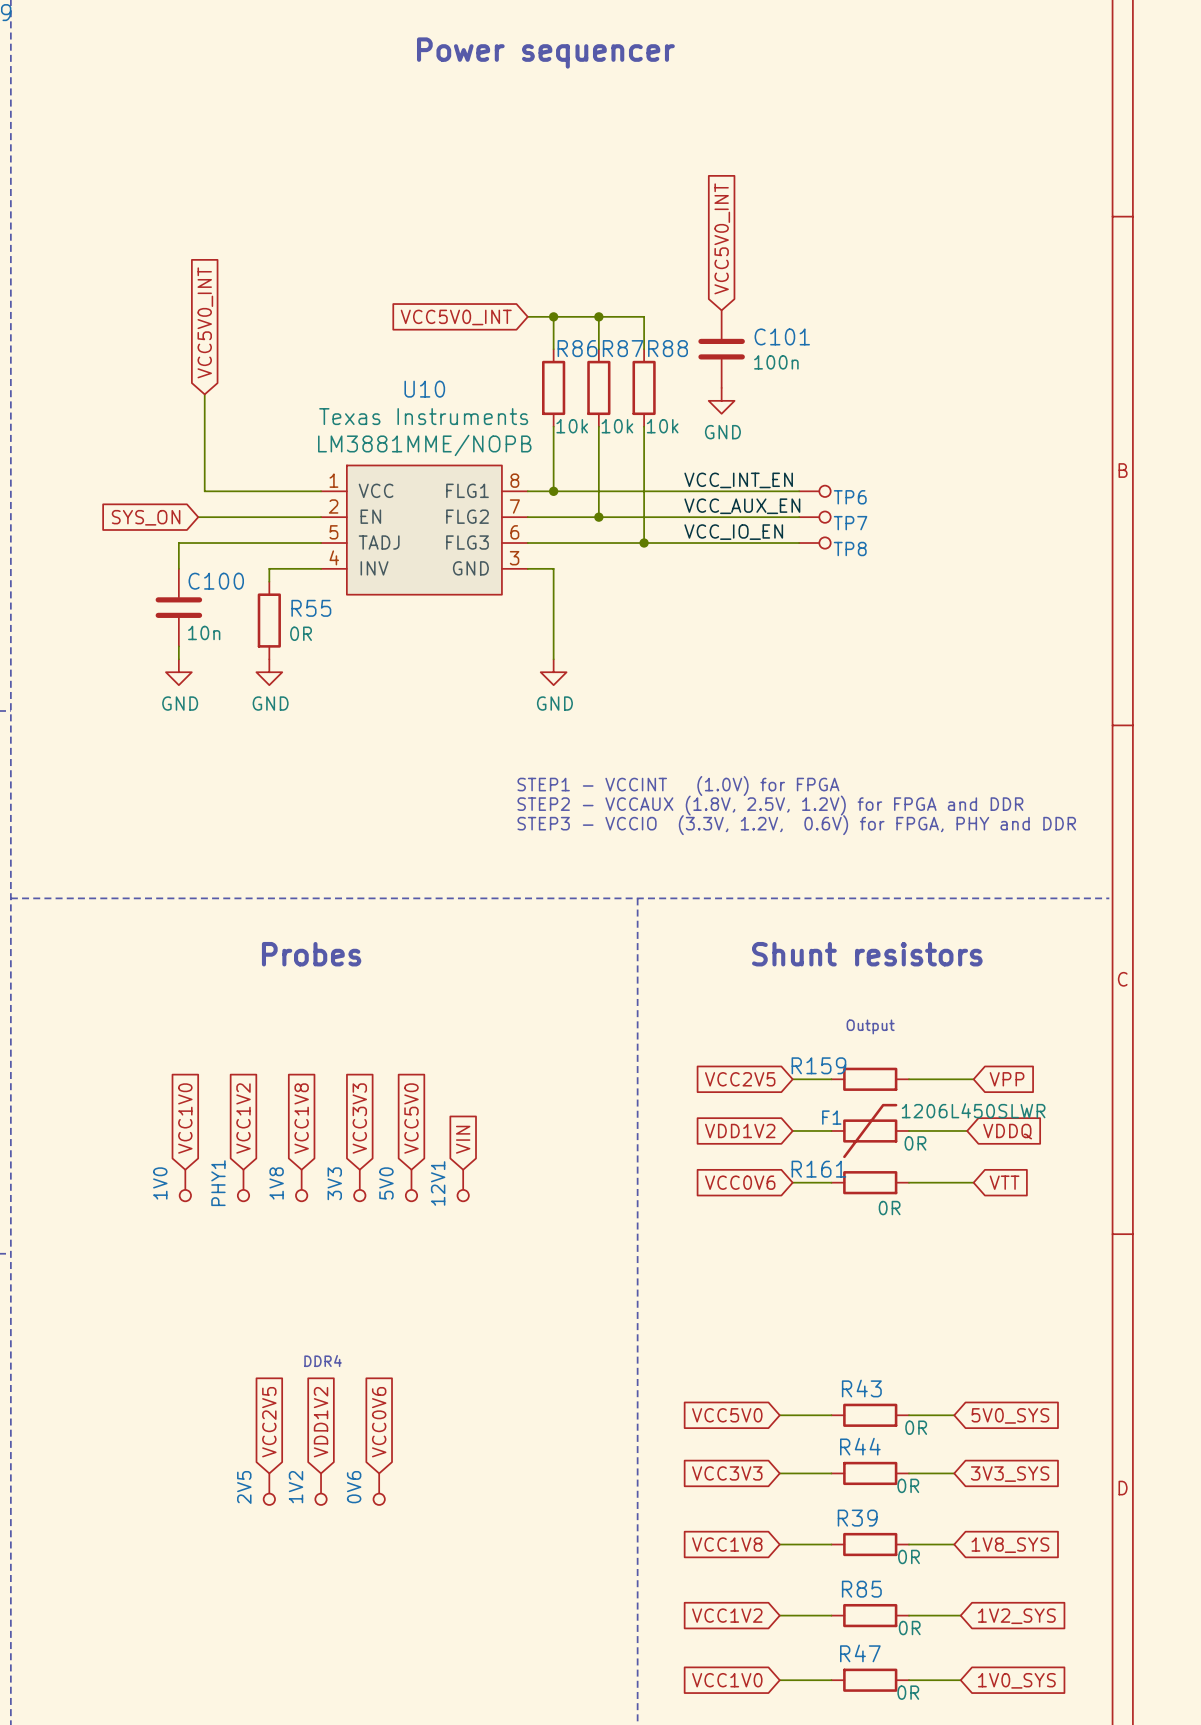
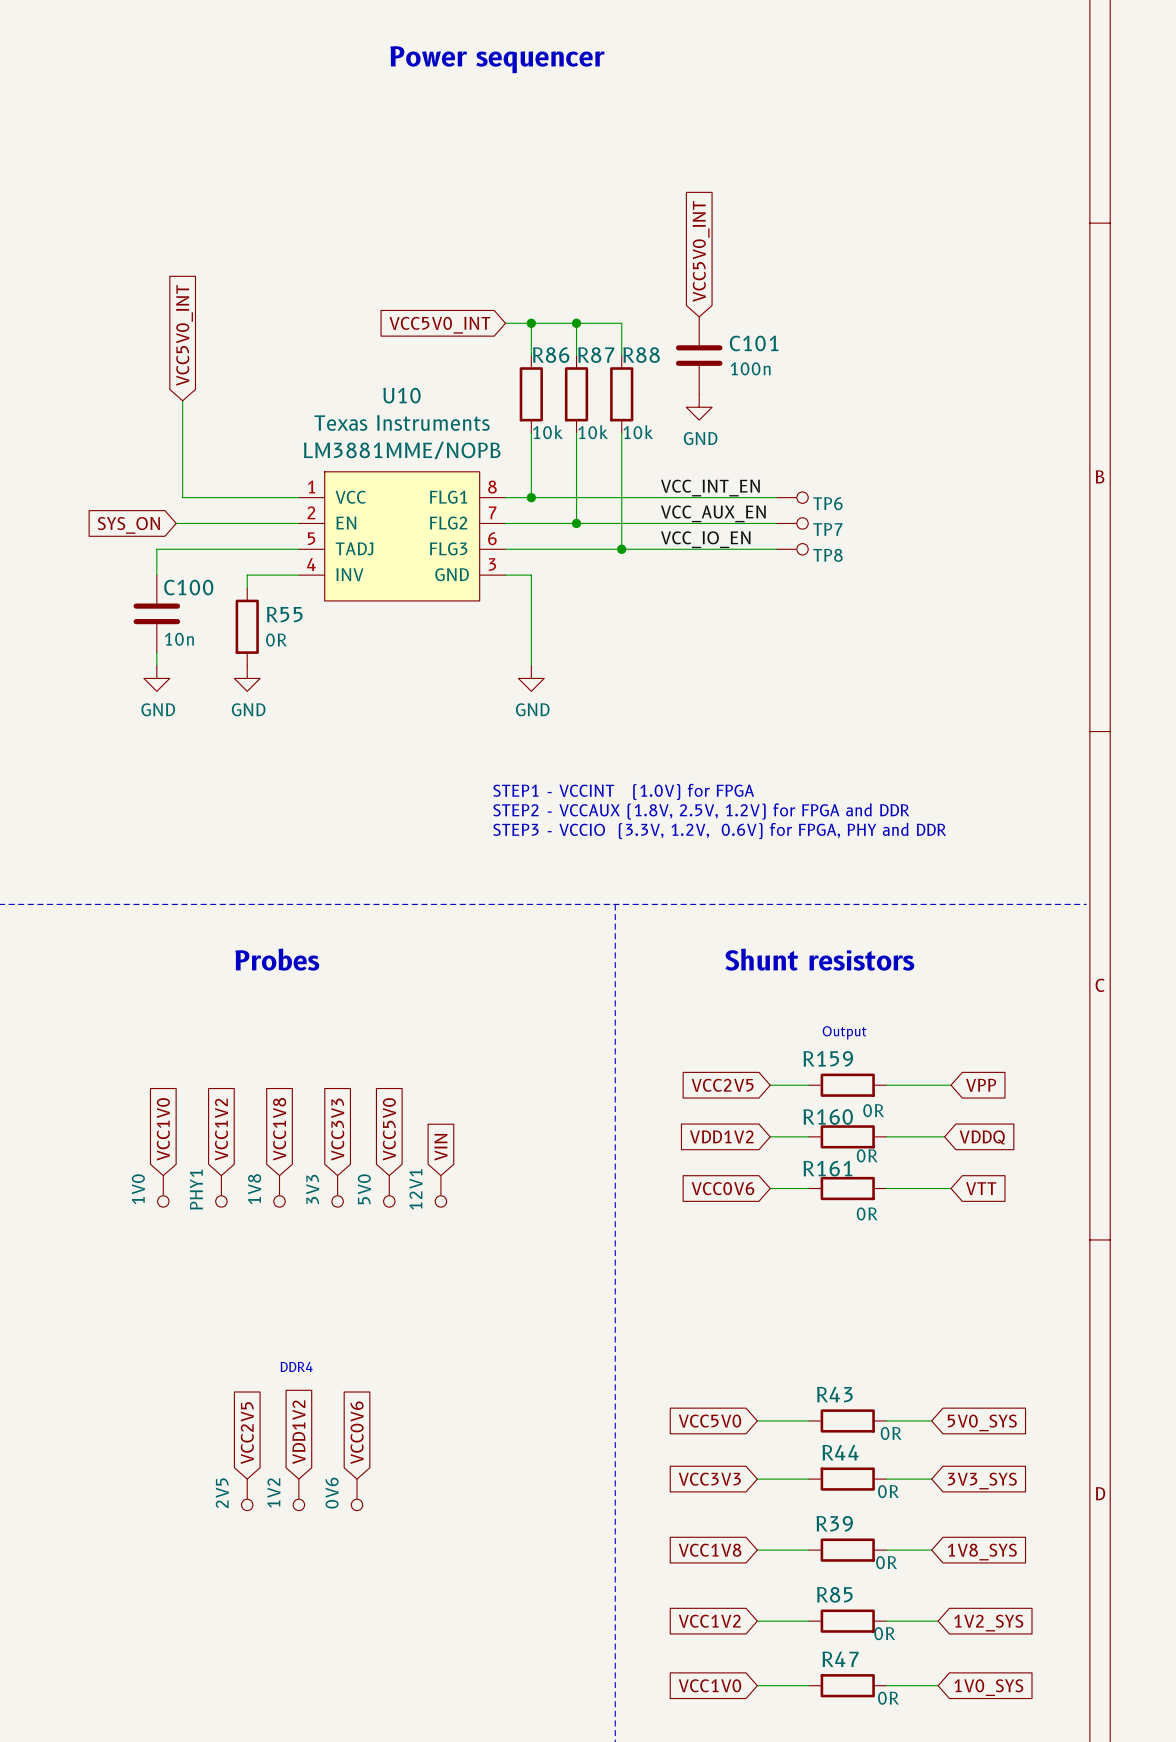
R159 name position: R159 (818, 1065) -> R159 (828, 1058)
F1: 1206L450SLWR (870, 1130) -> none
R160: none -> (847, 1136)
R159 text position: 0R (915, 1143) -> 0R (873, 1110)
R161 name position: R161 (818, 1169) -> R161 (827, 1168)

